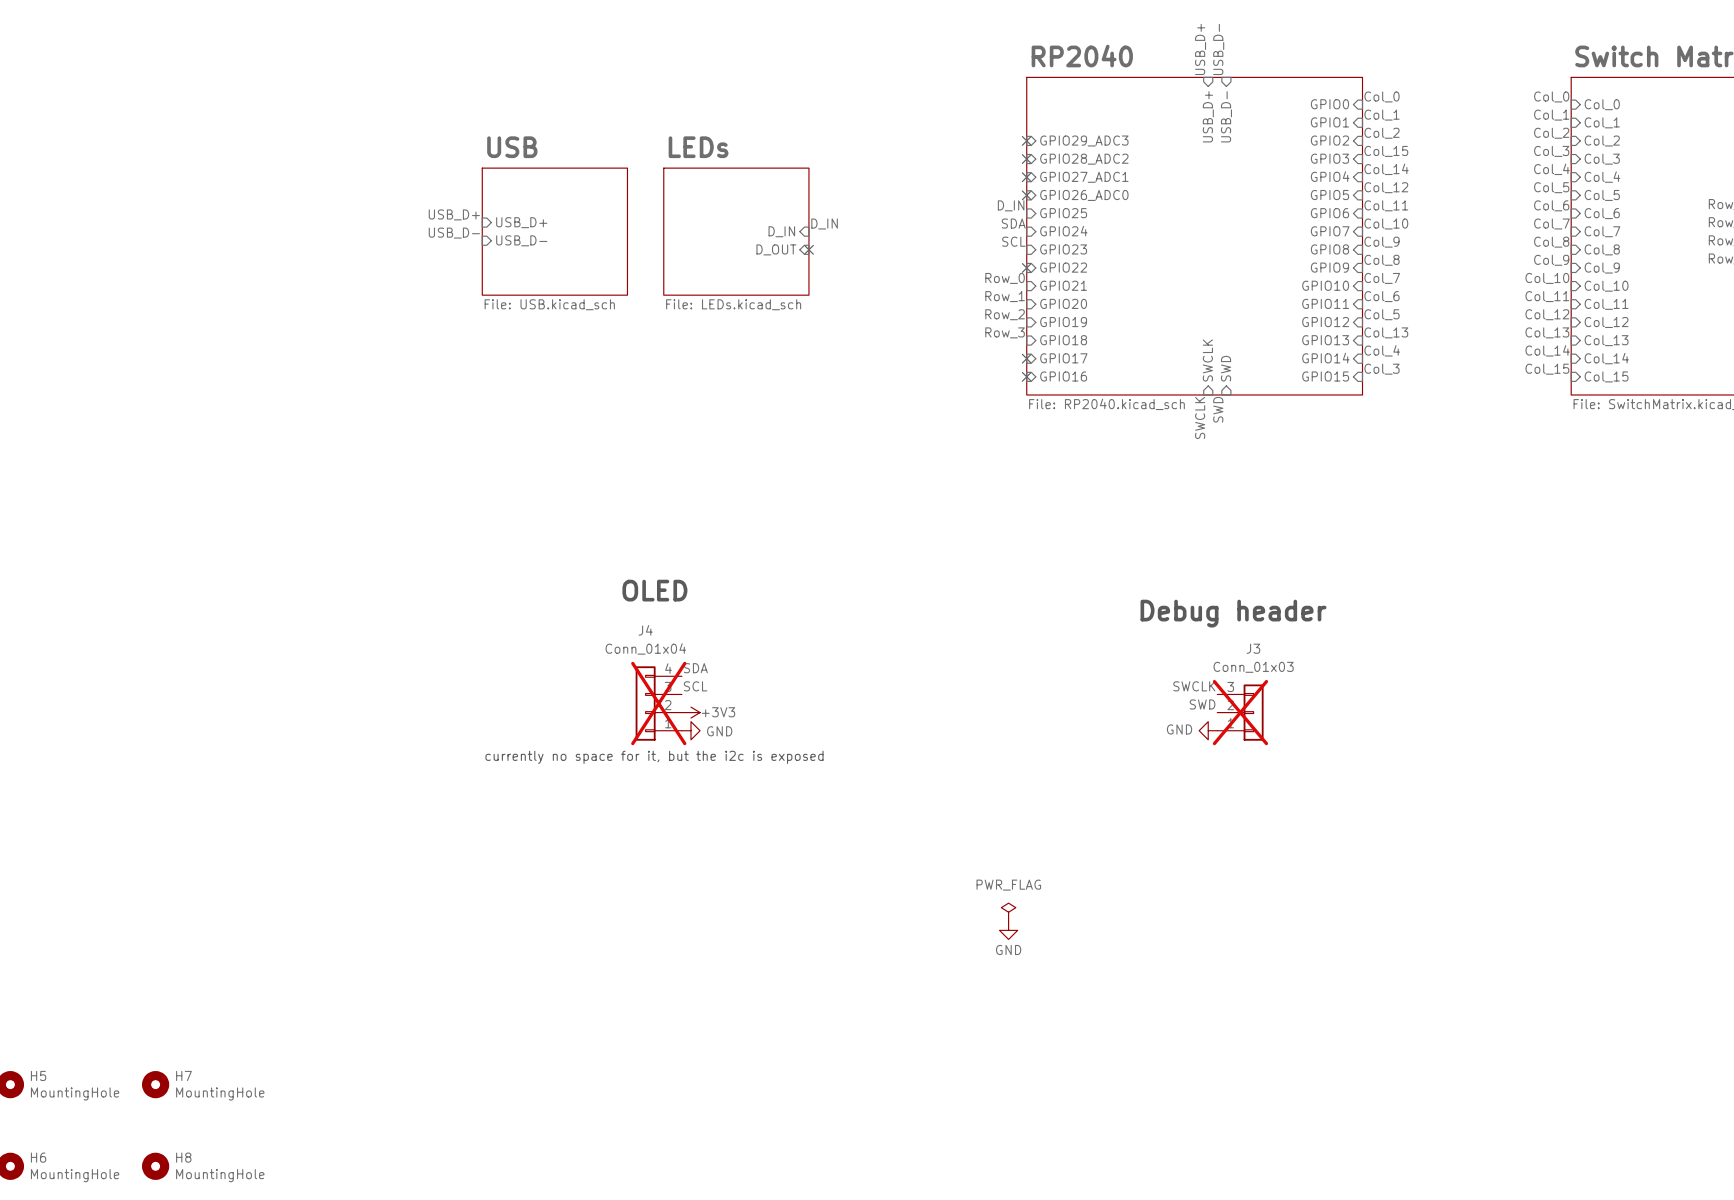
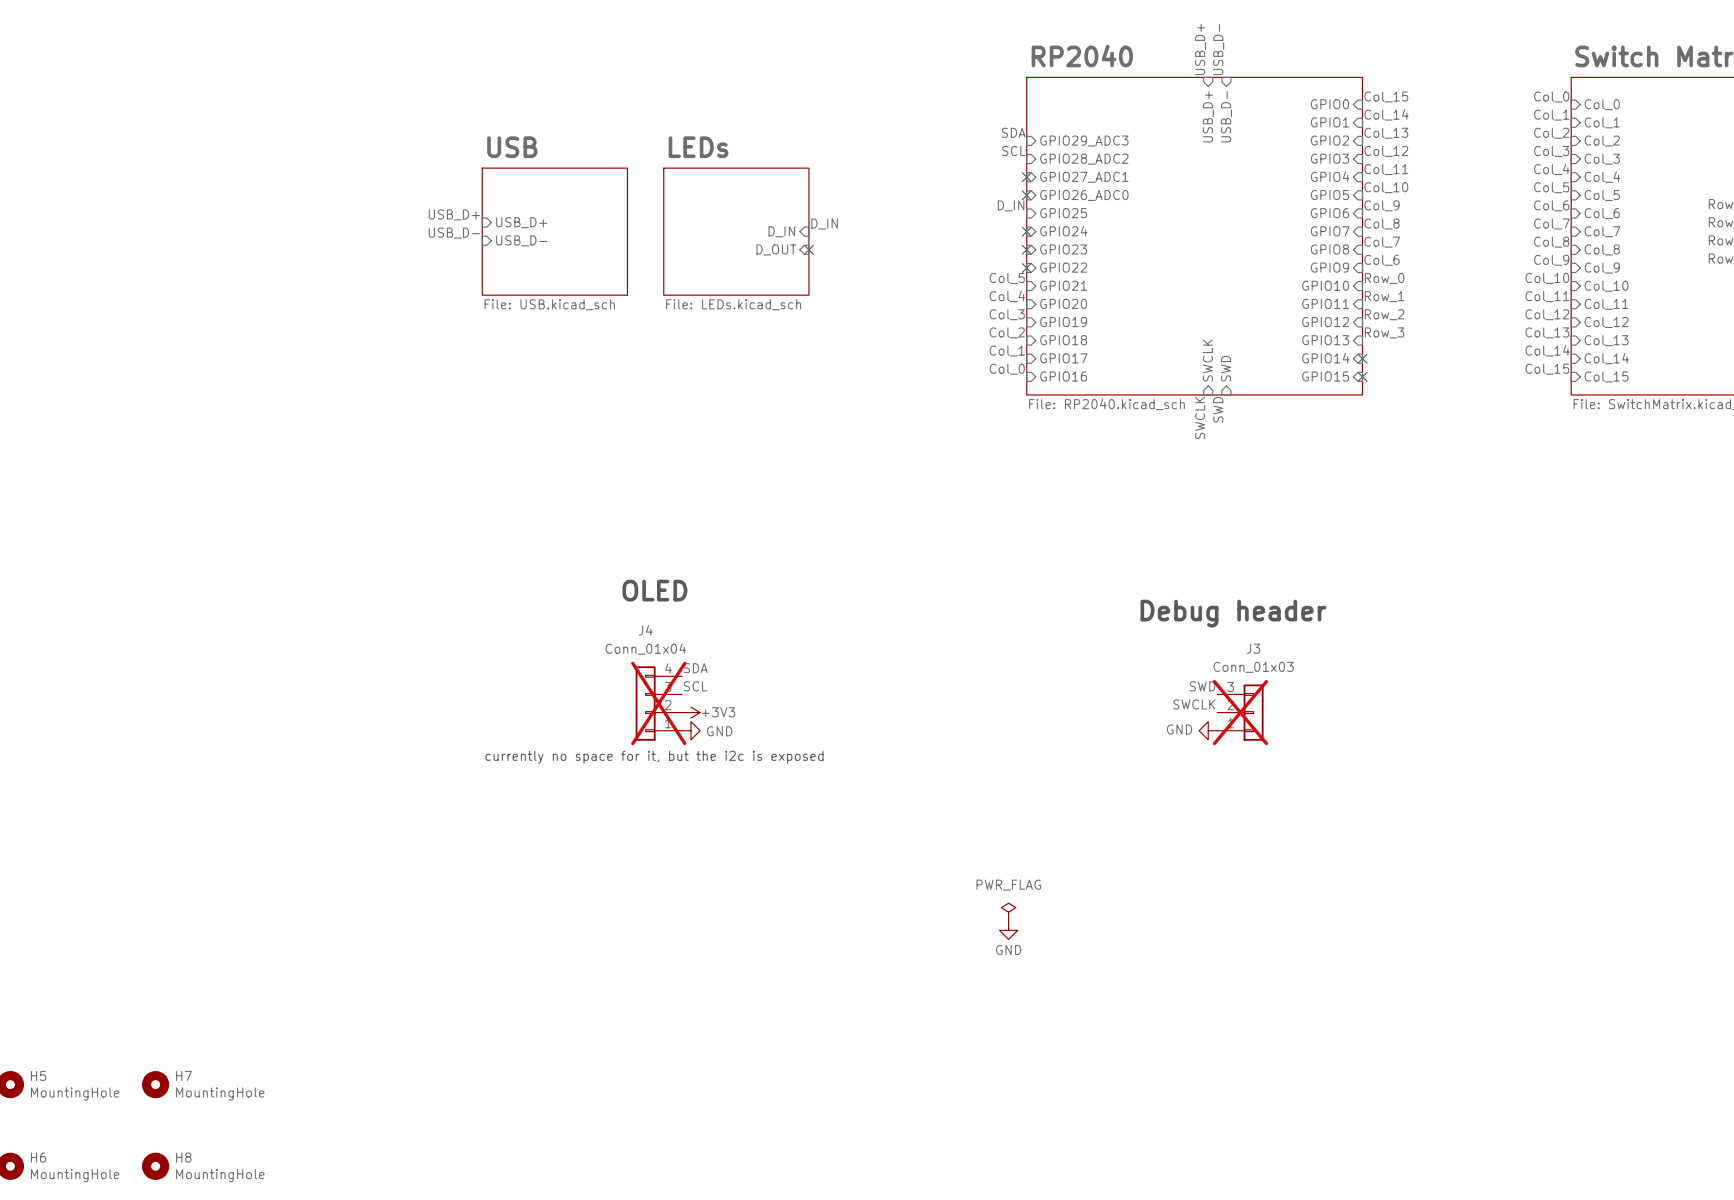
label: Col_0 (1382, 96) -> Col_15 (1386, 96)
label: Col_1 (1382, 115) -> Col_14 (1386, 114)
label: Col_2 (1382, 133) -> Col_13 (1386, 133)
no-connect mark: (1026, 140) -> none
label: Col_15 (1386, 151) -> Col_12 (1386, 151)
no-connect mark: (1026, 159) -> none
label: Col_14 (1386, 169) -> Col_11 (1386, 169)
label: Col_12 (1386, 187) -> Col_10 (1386, 187)
label: Col_11 (1386, 205) -> Col_9 (1382, 205)
label position: SDA (1013, 223) -> SDA (1013, 132)
label: Col_10 (1386, 223) -> Col_8 (1382, 223)
no-connect mark: none -> (1026, 231)
label position: SCL (1013, 241) -> SCL (1013, 150)
label: Col_9 (1382, 242) -> Col_7 (1382, 242)
no-connect mark: none -> (1026, 249)
label: Col_8 (1382, 260) -> Col_6 (1382, 260)
label: Row_0 (1005, 278) -> Col_5 (1007, 278)
label: Col_7 (1382, 278) -> Row_0 (1384, 278)
label: Row_1 (1005, 296) -> Col_4 (1007, 296)
label: Col_6 (1382, 296) -> Row_1 (1384, 296)
label: Row_2 (1005, 314) -> Col_3 (1007, 314)
label: Col_5 (1382, 314) -> Row_2 (1384, 314)
label: Row_3 (1005, 332) -> Col_2 (1007, 332)
label: Col_13 (1386, 332) -> Row_3 (1384, 332)
label: Col_4 (1382, 350) -> none
label: none -> Col_1 (1007, 351)
no-connect mark: (1026, 358) -> none
no-connect mark: none -> (1362, 358)
label: none -> Col_0 (1007, 369)
label: Col_3 (1382, 369) -> none
no-connect mark: (1026, 376) -> none
no-connect mark: none -> (1362, 376)
label: SWCLK (1194, 686) -> SWD (1202, 686)
label: SWD (1202, 704) -> SWCLK (1194, 704)

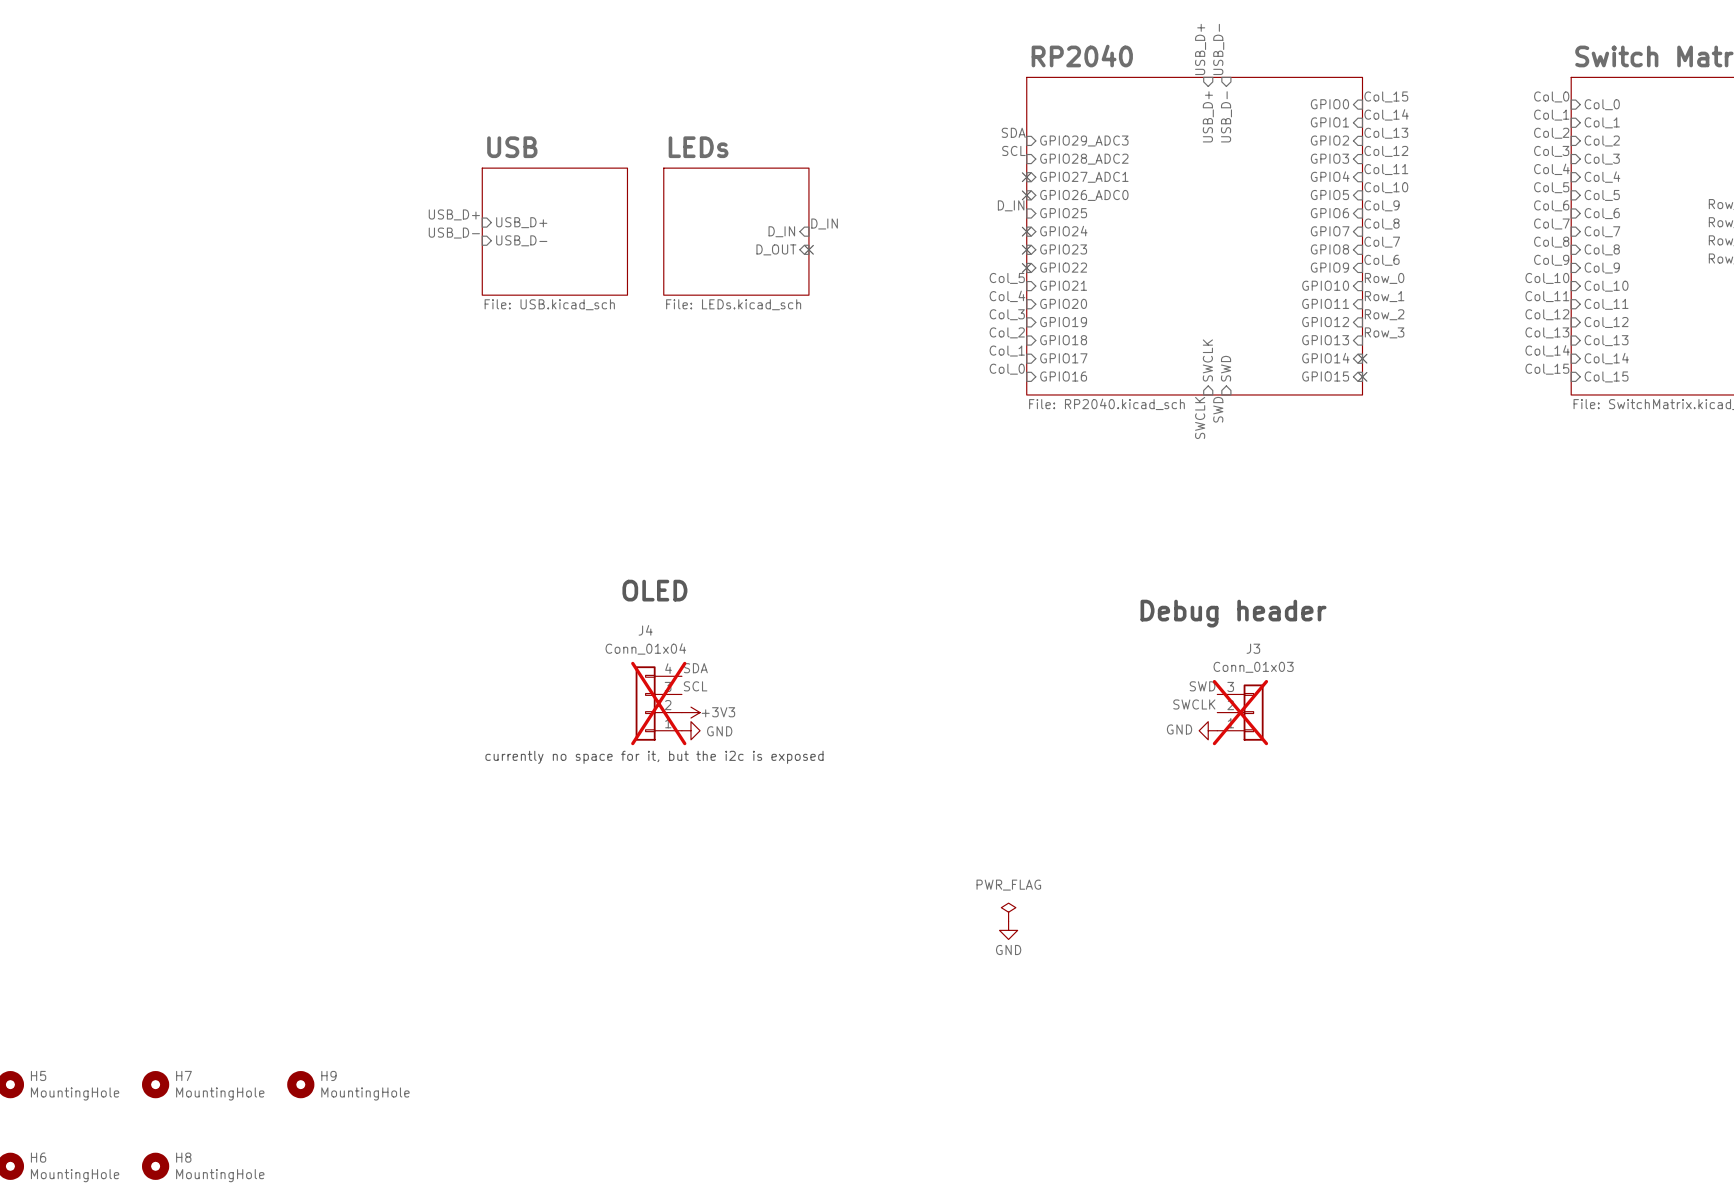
H9: none -> MountingHole (300, 1084)

